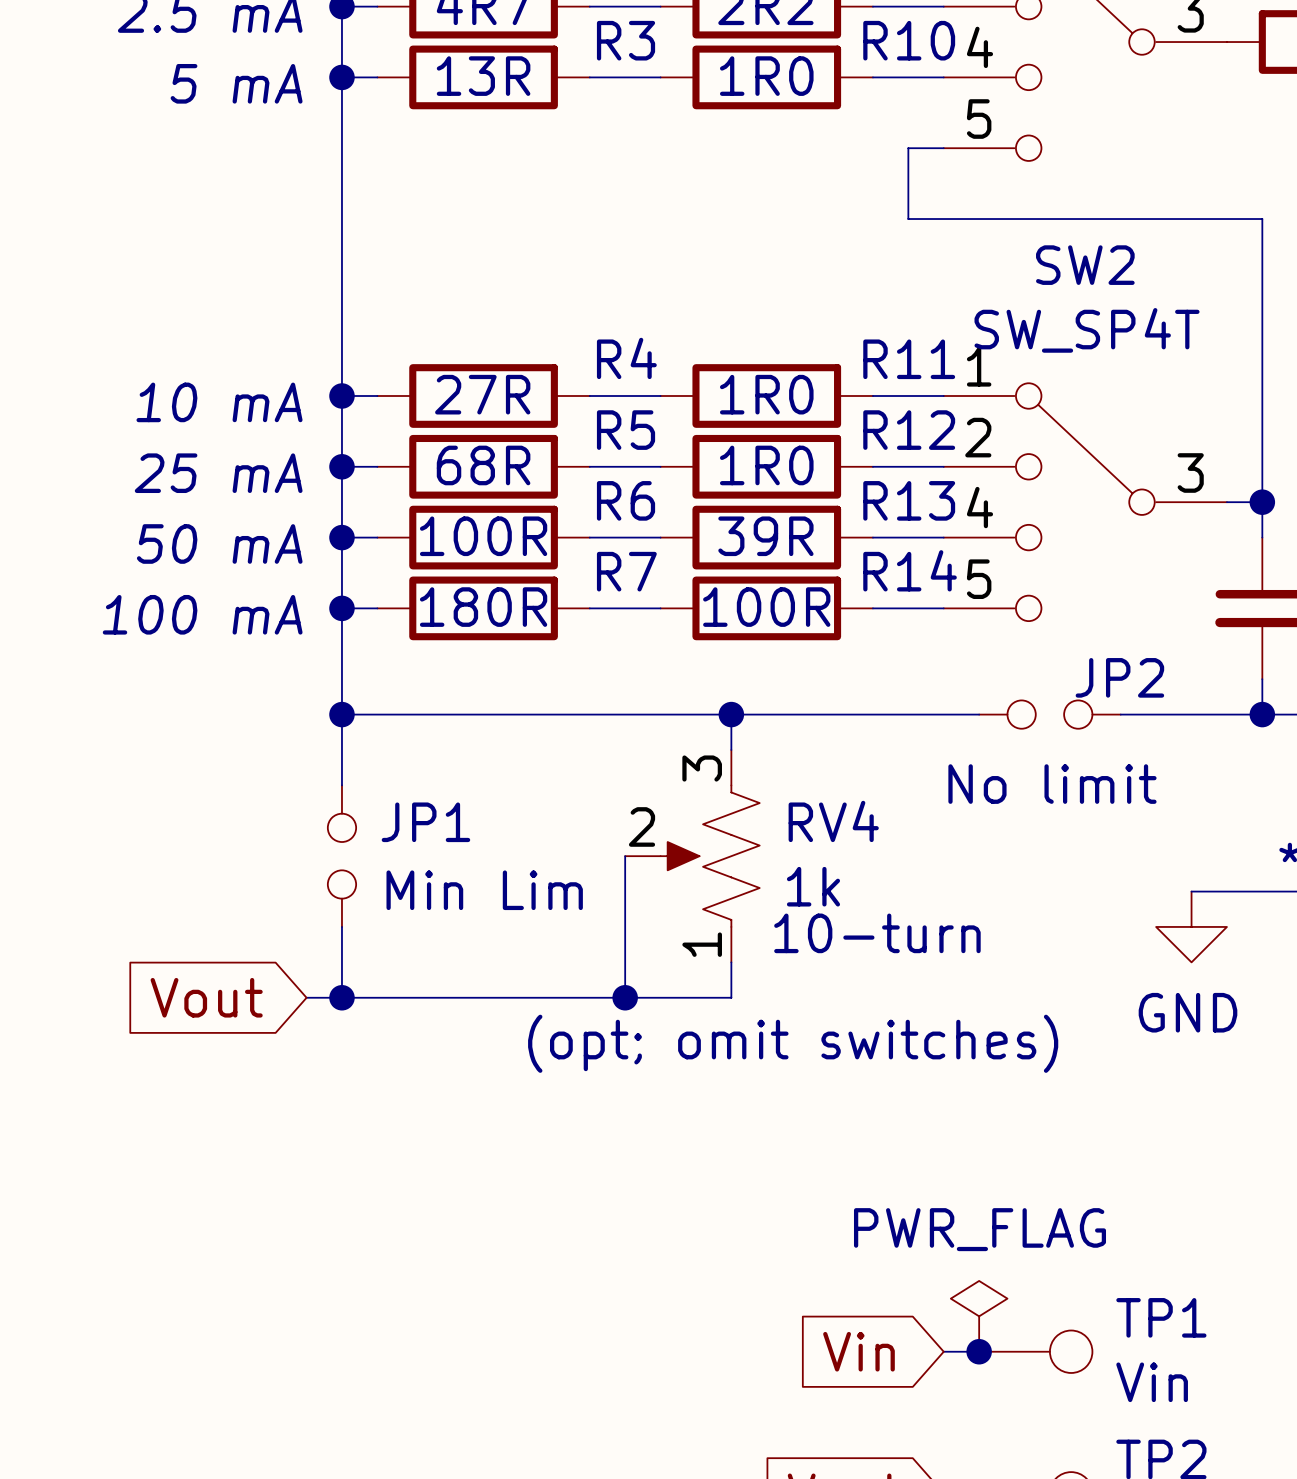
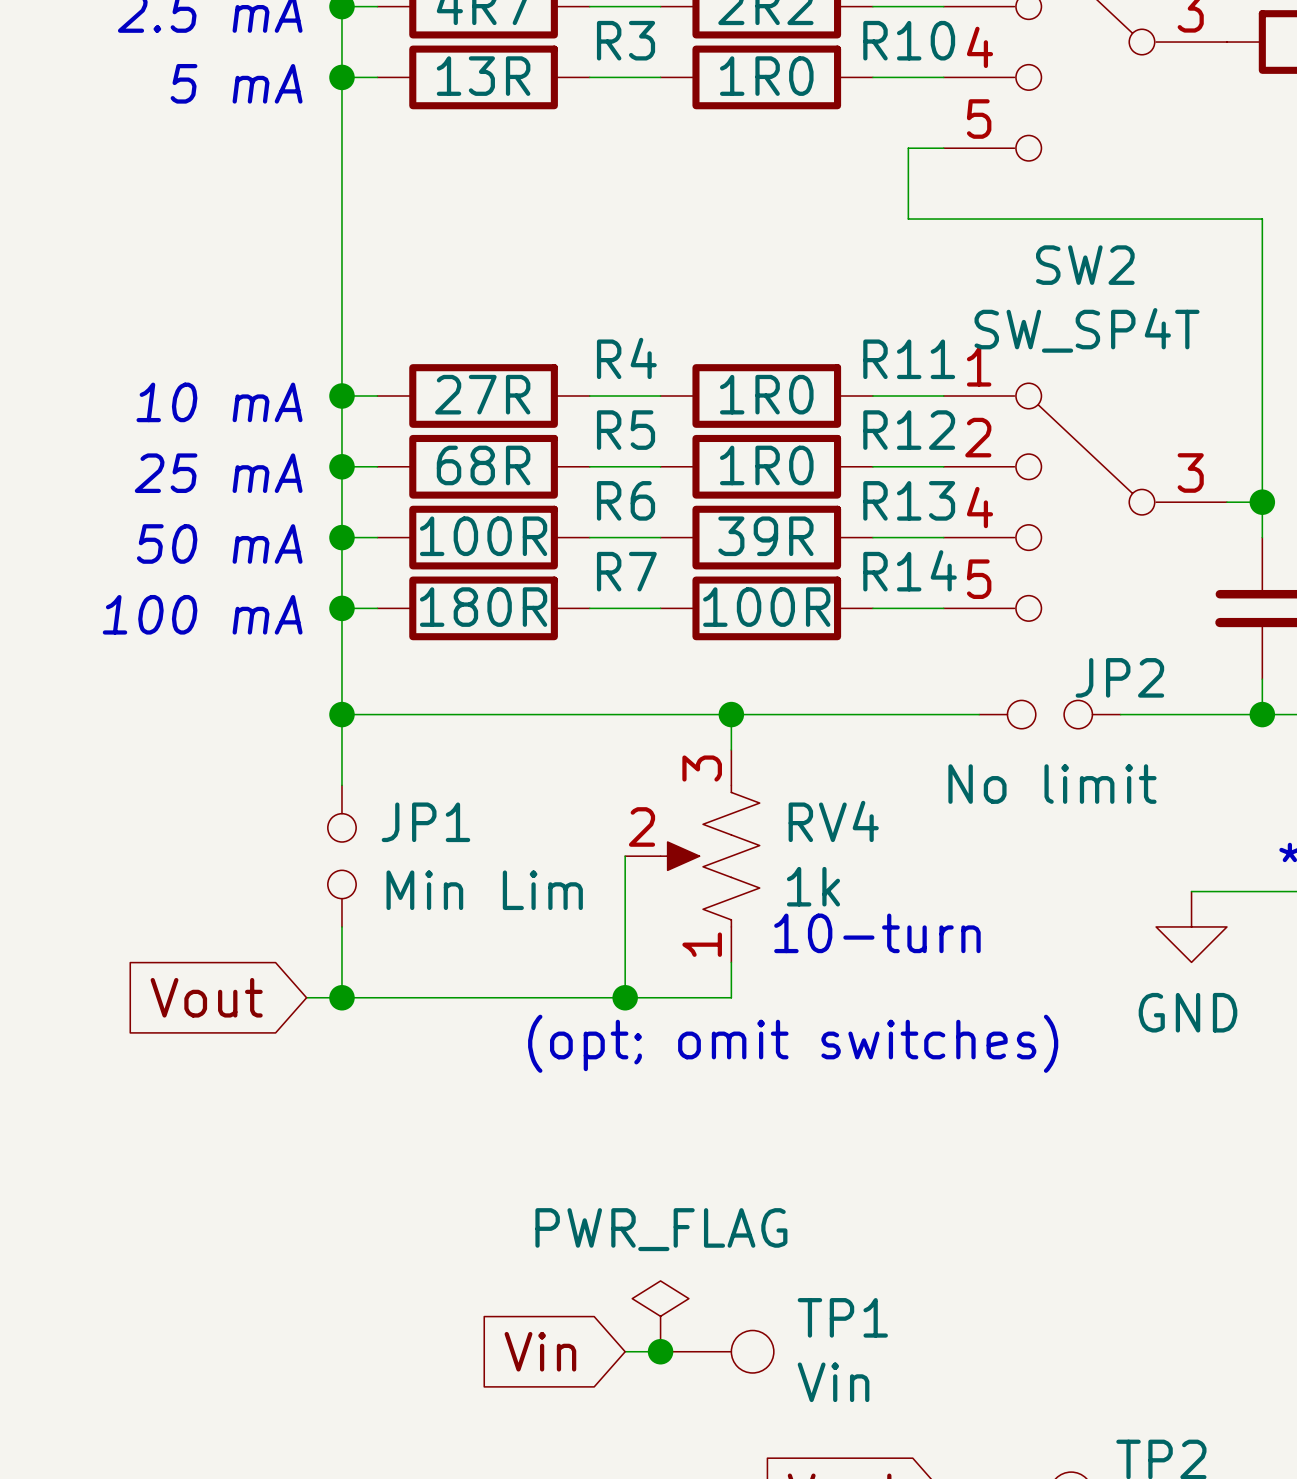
power symbol position: PWR_FLAG (979, 1316) -> PWR_FLAG (660, 1316)
junction: none -> (660, 1351)
global label position: Vin (858, 1351) -> Vin (540, 1351)
wire: (943, 1351) (979, 1351) -> (625, 1351) (660, 1351)
junction: (979, 1351) -> none
TP1 position: (1035, 1351) -> (717, 1351)

